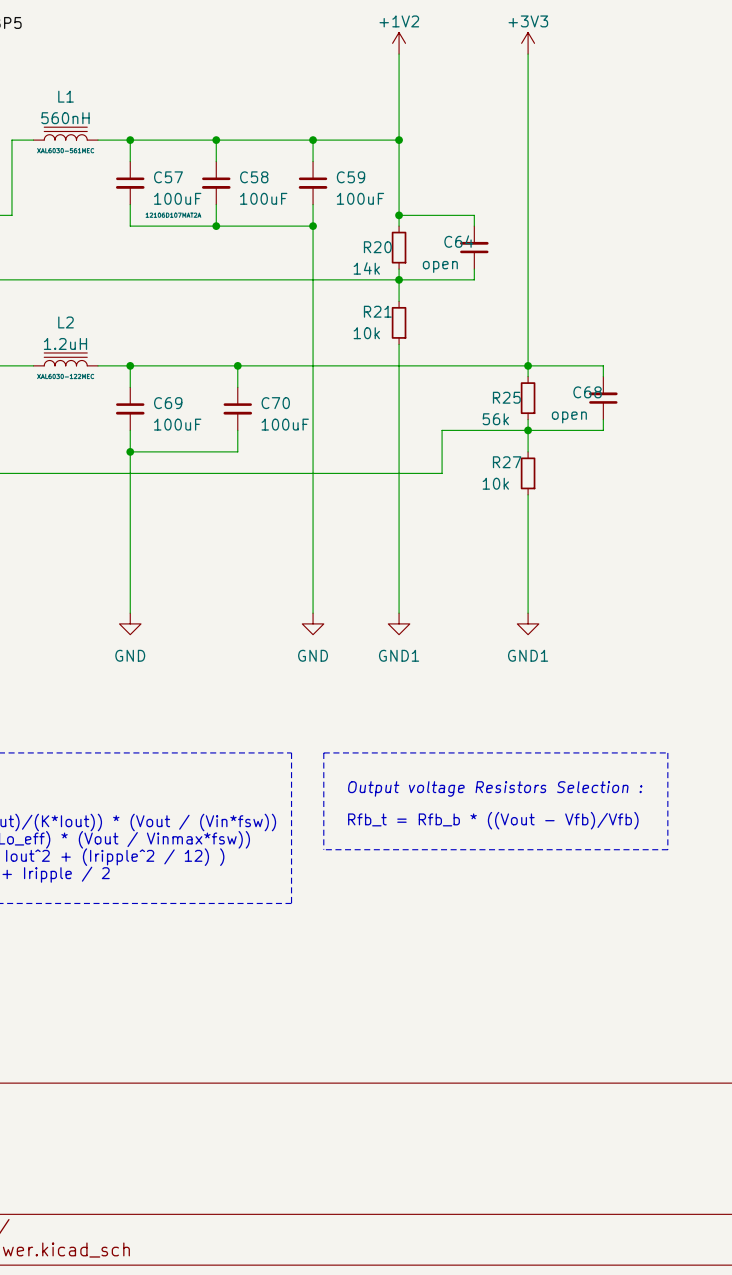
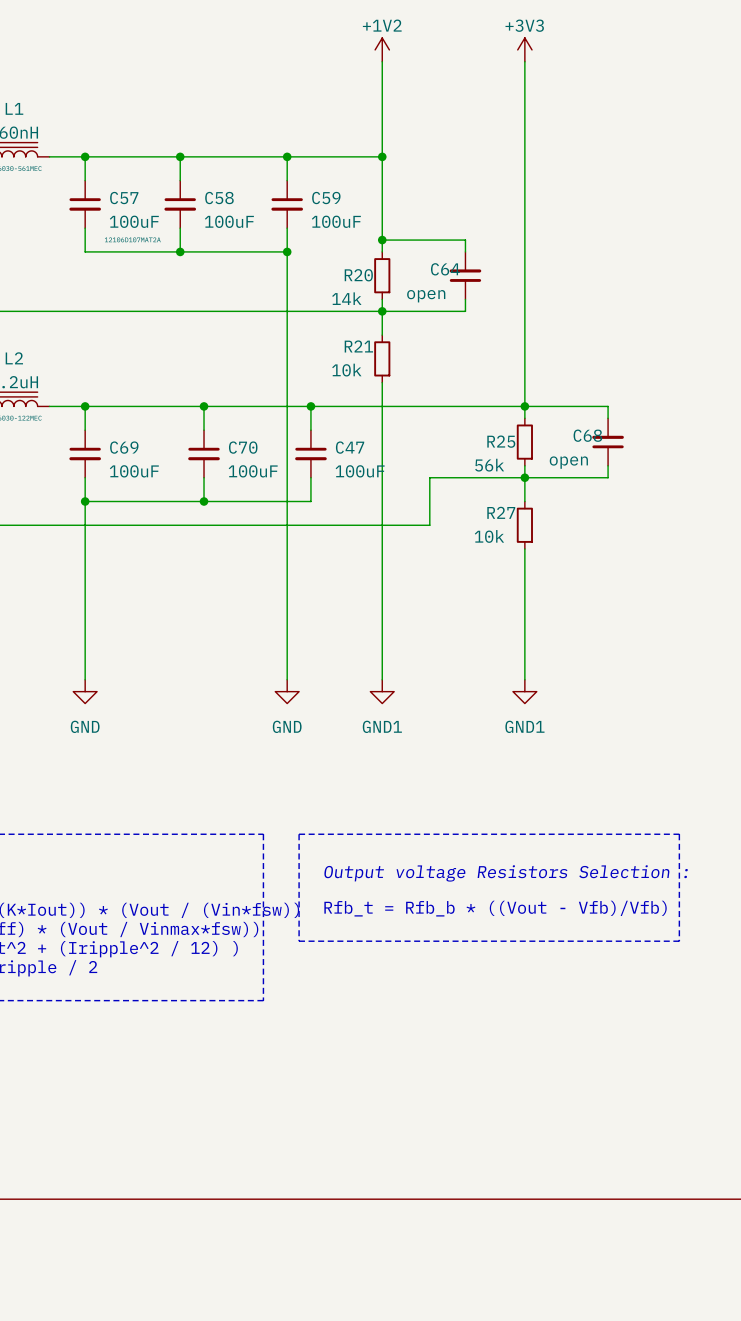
wire: none -> (310, 406) (310, 430)
junction: none -> (310, 406)
C47: none -> 100uF (310, 453)
wire: none -> (310, 477) (310, 501) (204, 501)
junction: none -> (204, 501)

